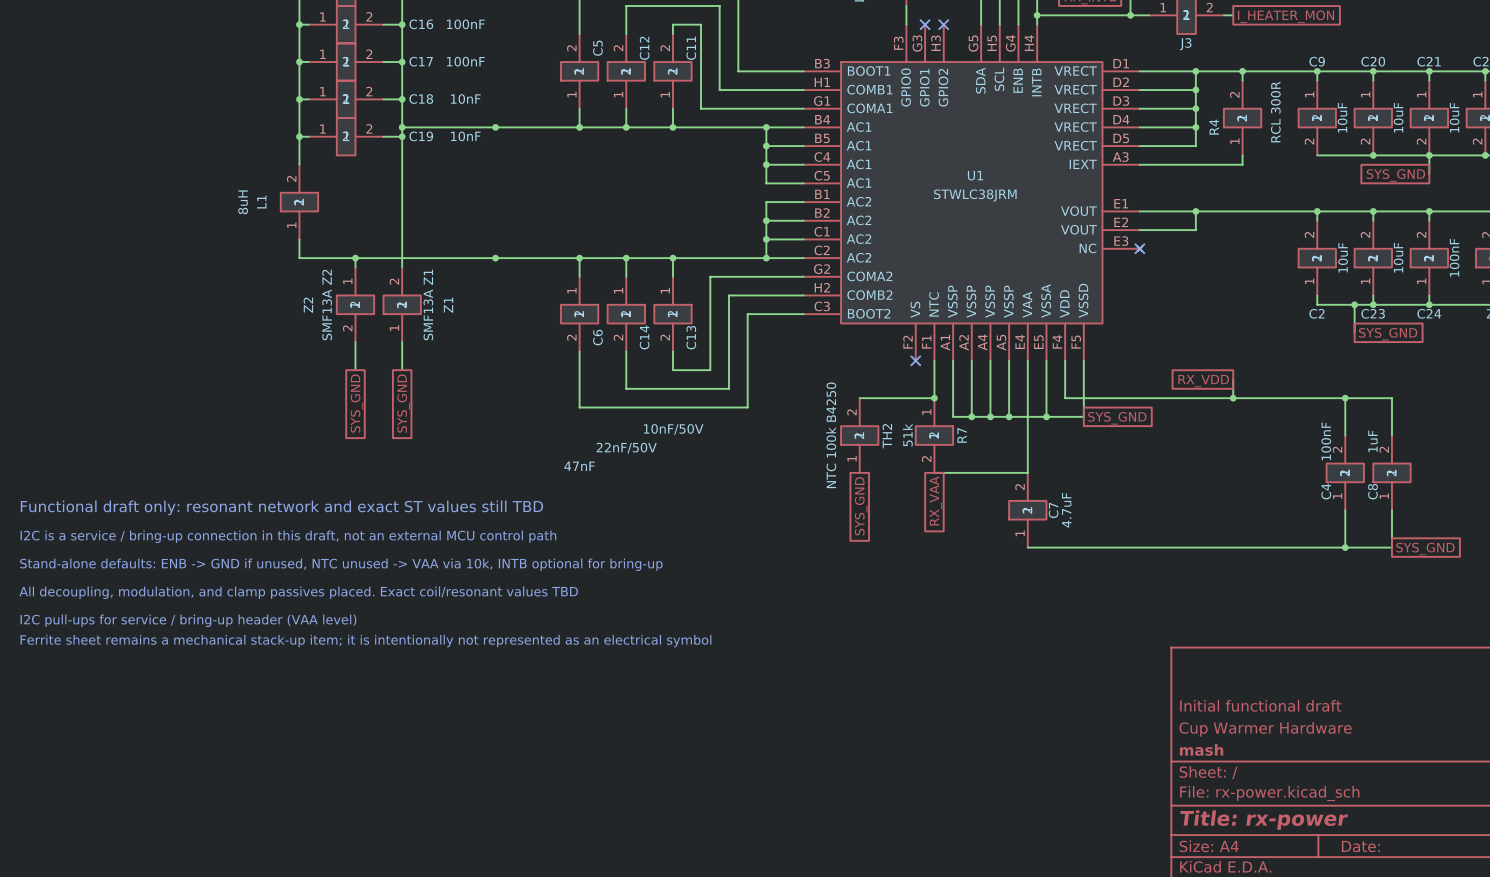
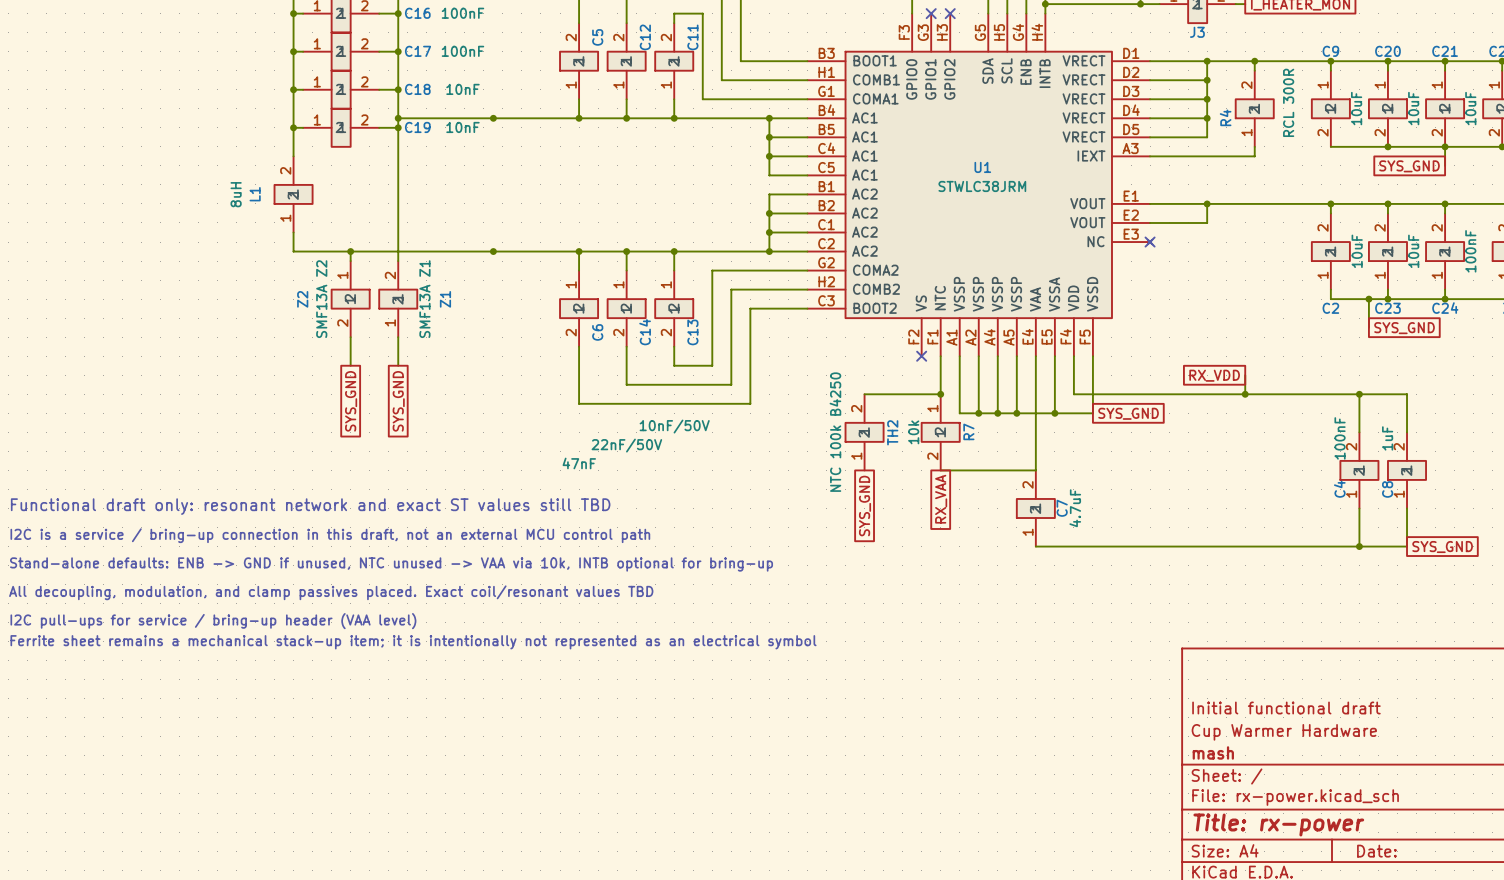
R7 value: 51k (907, 435) -> 10k (913, 432)

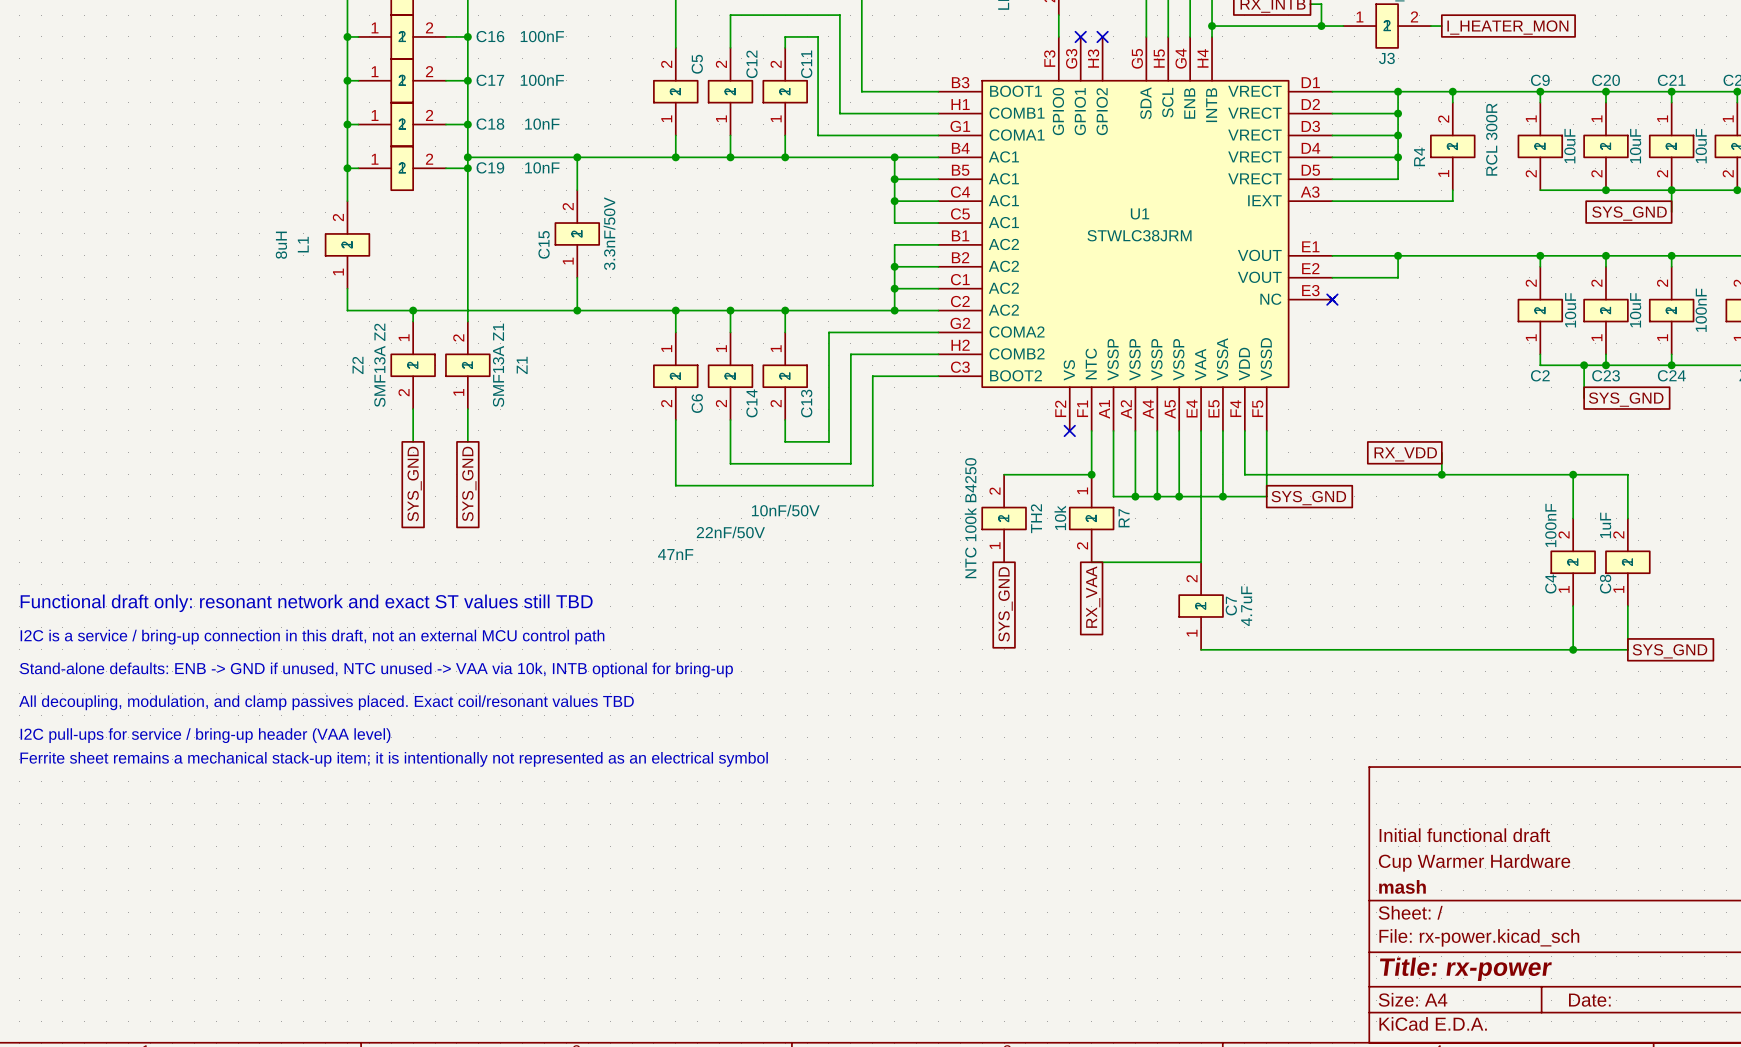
wire: none -> (577, 157) (577, 190)
C15: none -> 3.3nF/50V (577, 233)
wire: none -> (577, 277) (577, 310)

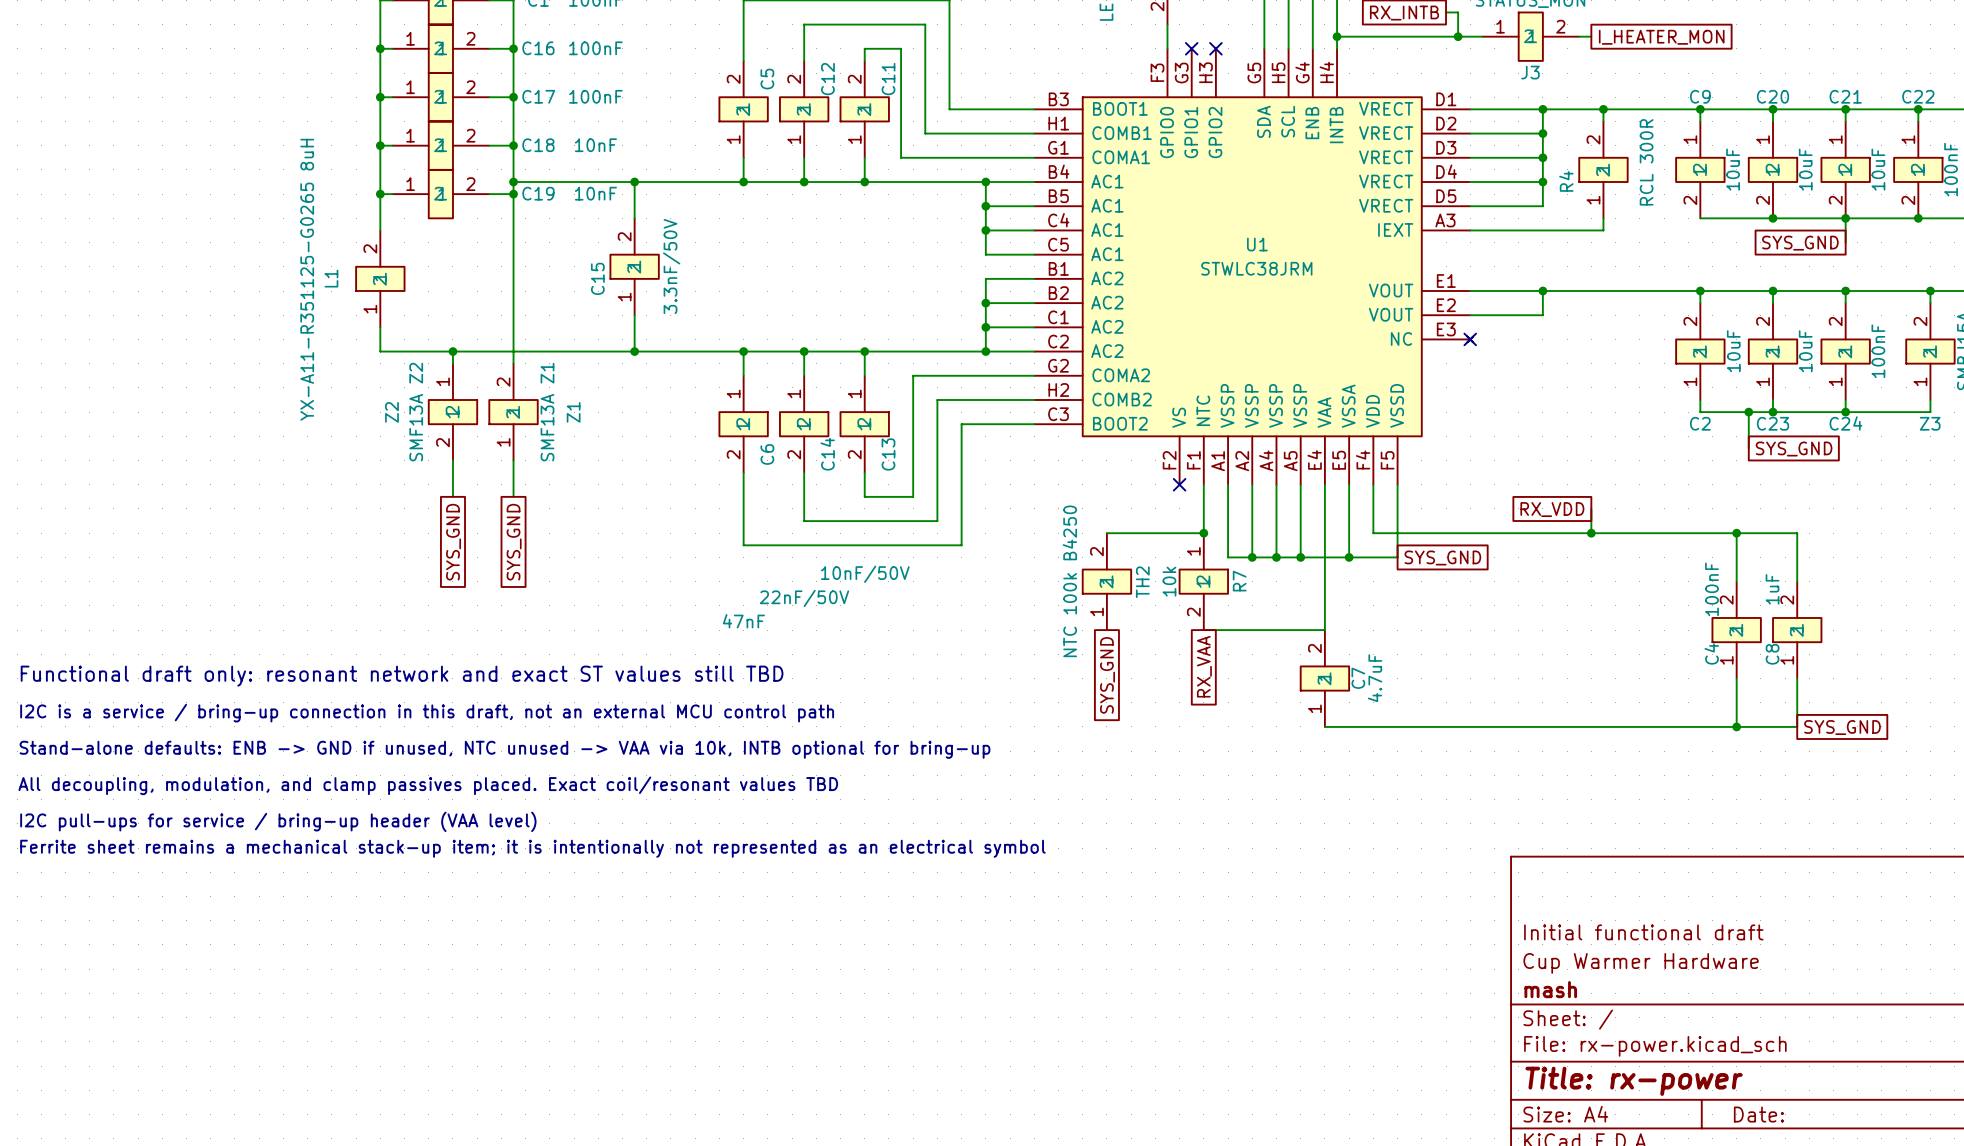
L1 value: 8uH (281, 245) -> YX-A11-R351125-G0265 8uH (307, 279)

